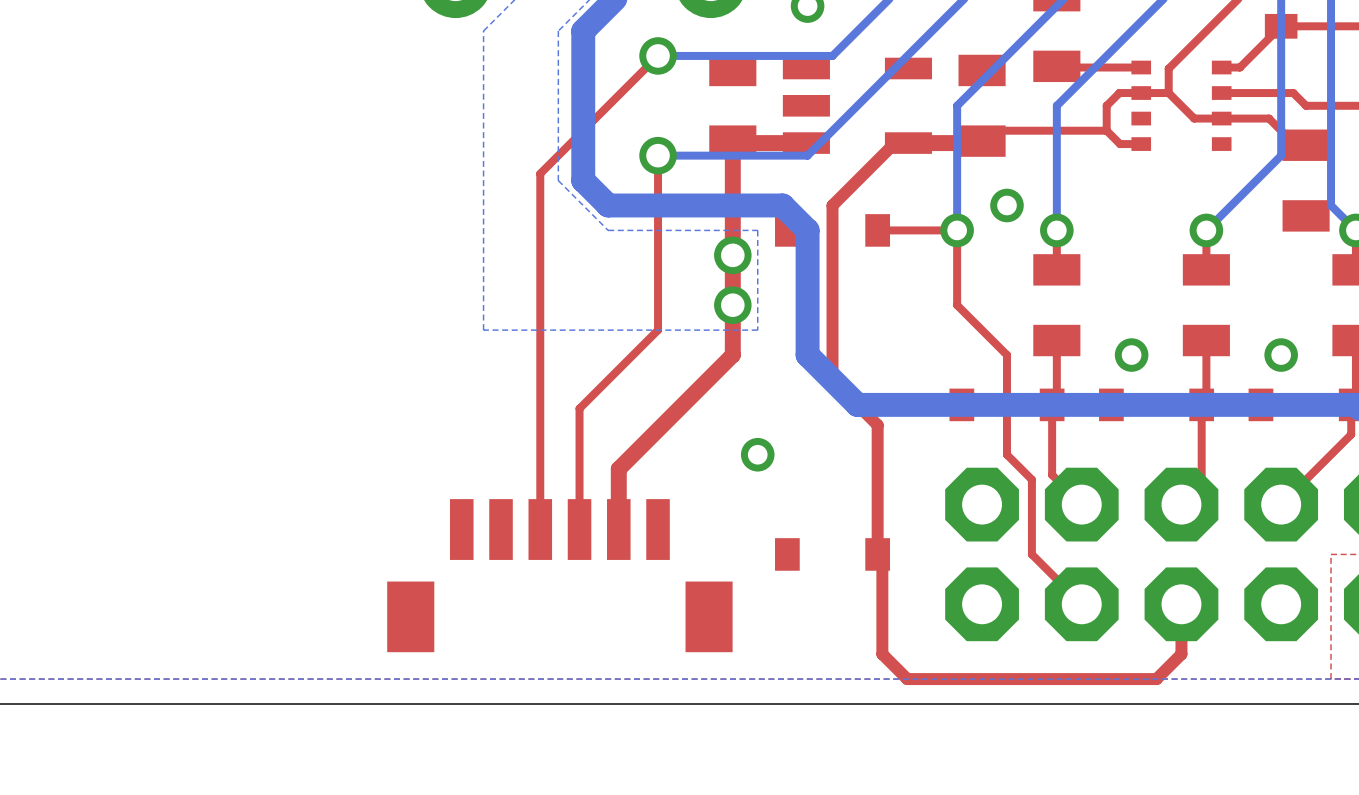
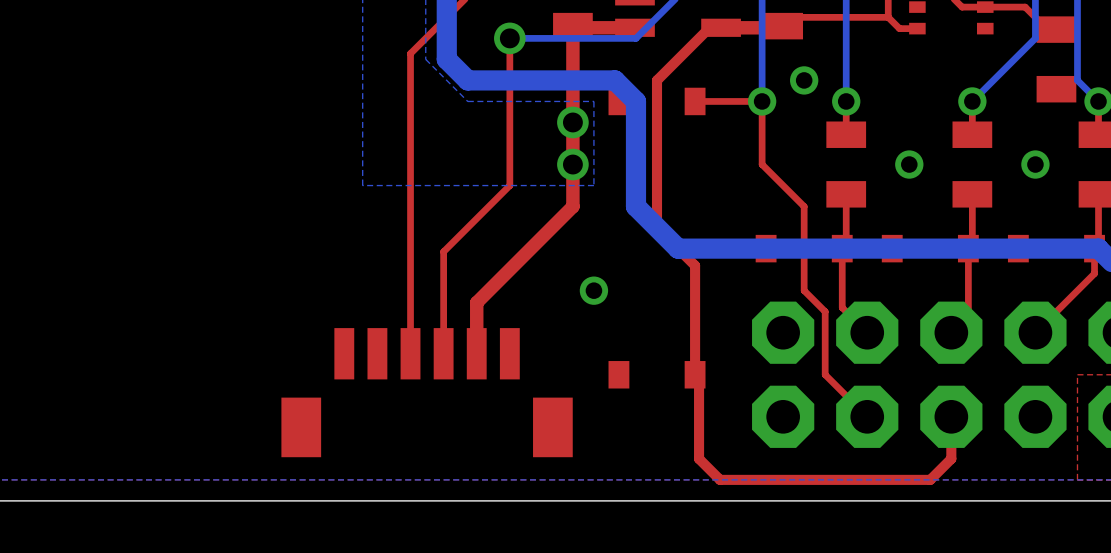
via position: (1131, 355) -> (909, 164)
via position: (1281, 355) -> (1035, 164)

